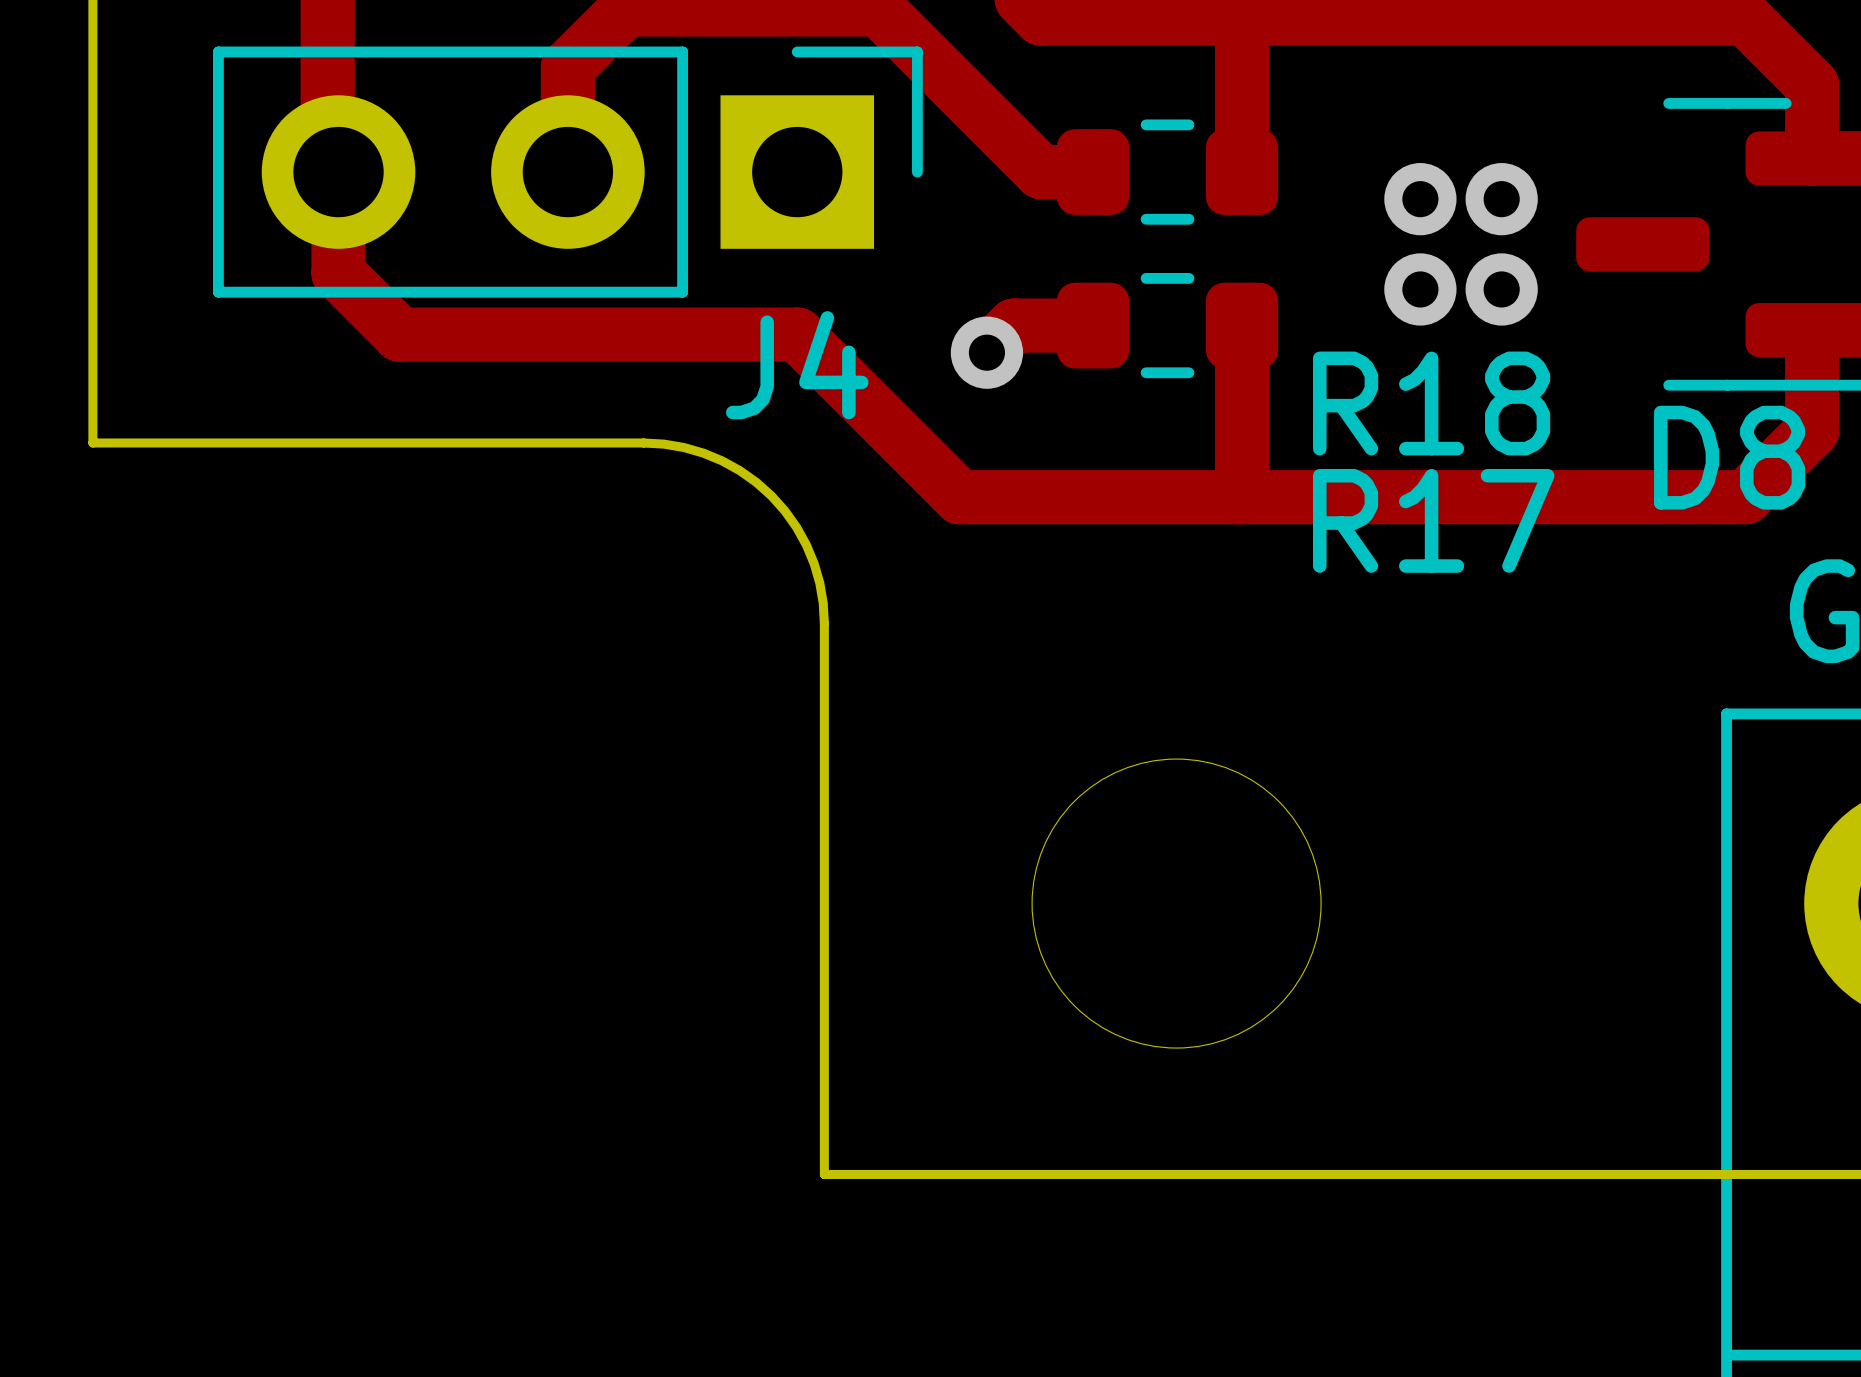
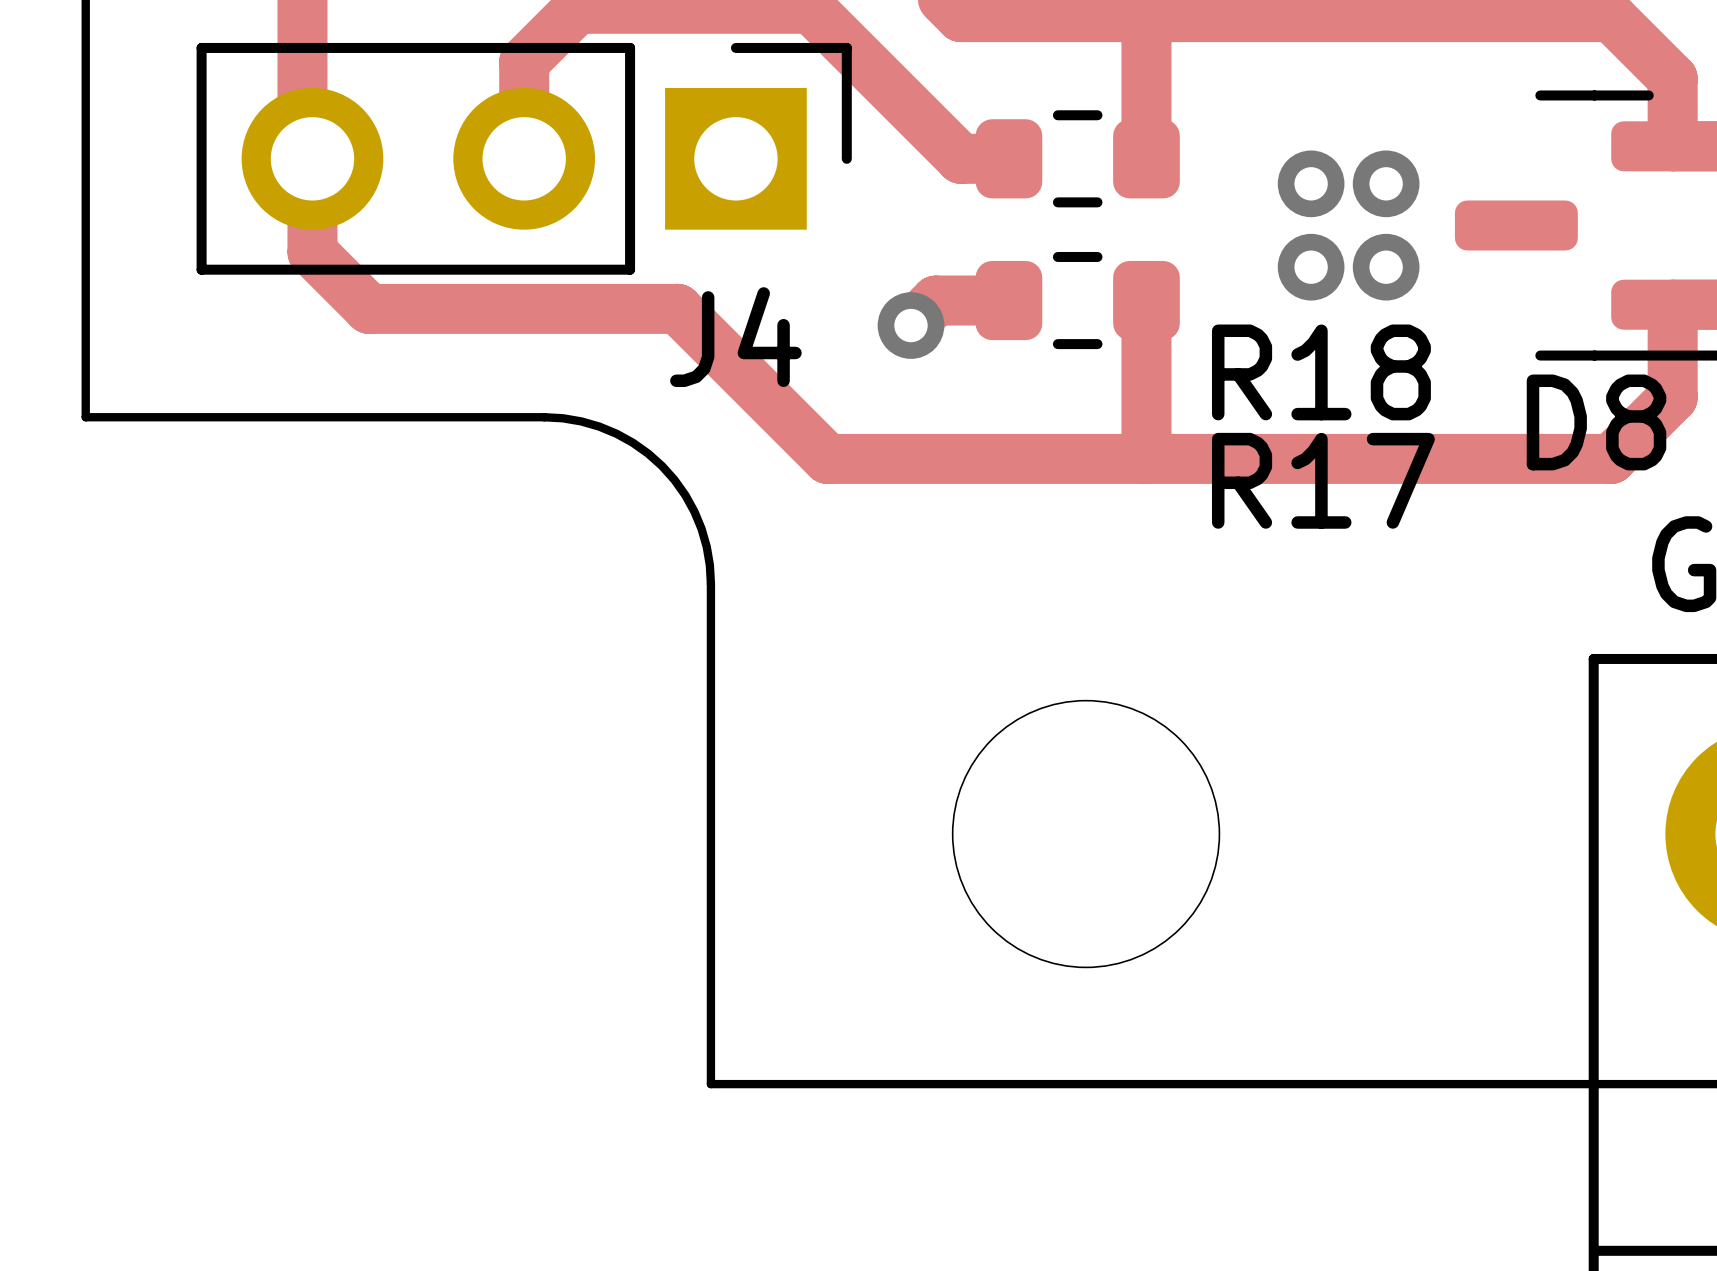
top track: (734, 334) (797, 334) (959, 497) -> (677, 308) (827, 458) (885, 458)
board edge: (92, 442) (663, 444) (703, 453) (722, 460) (756, 482) (771, 495) (796, 527) (806, 545) (819, 583) (823, 603) (824, 1174) -> (85, 408) (85, 417) (562, 418) (581, 421) (616, 433) (632, 442) (662, 466) (685, 495) (694, 511) (706, 546) (709, 565) (710, 1084) (760, 1084)

